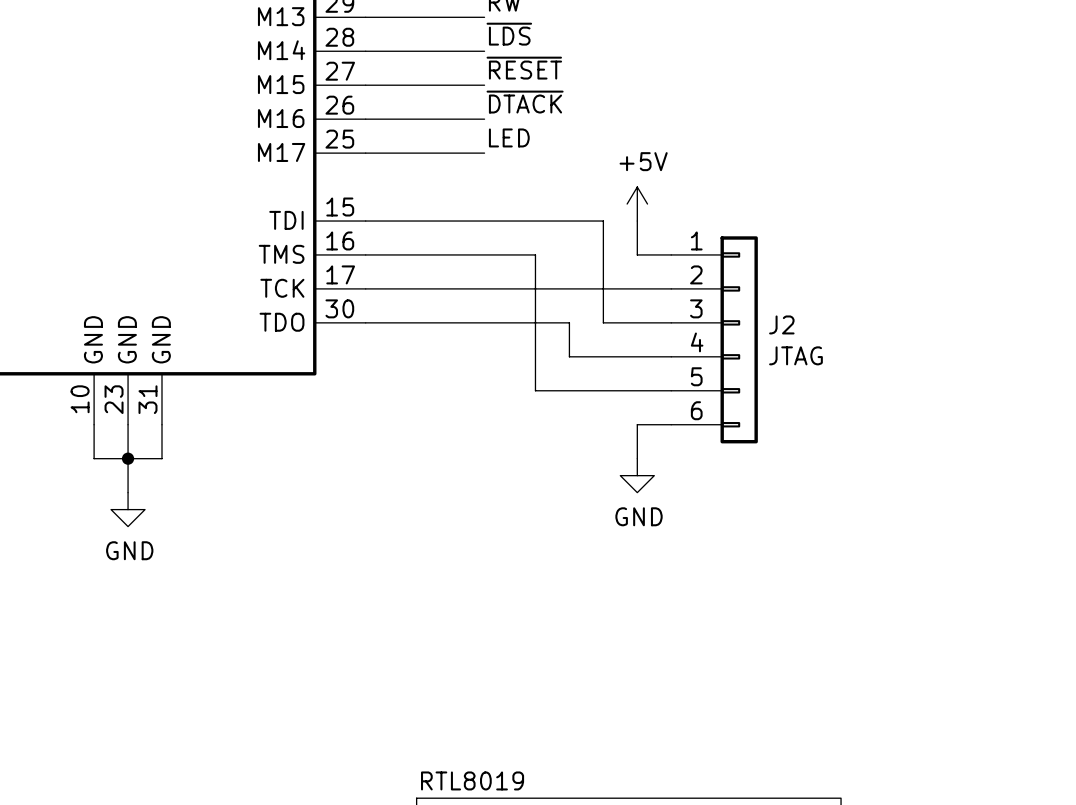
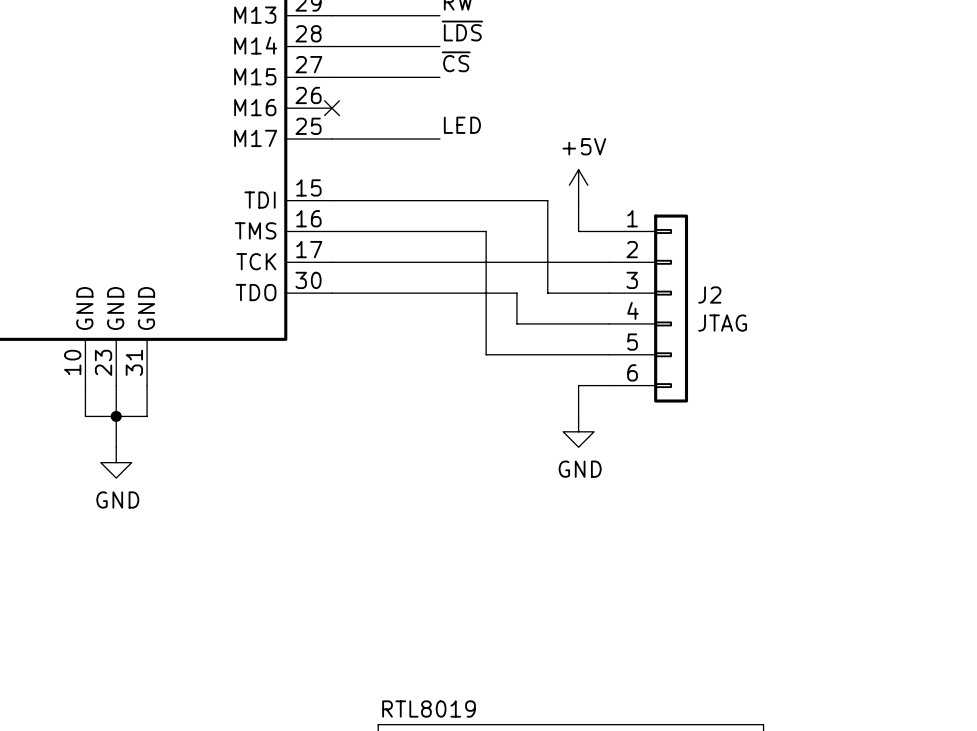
label: ~{RESET} (524, 68) -> ~{CS} (456, 61)
label: ~{DTACK} (525, 102) -> none
wire: (365, 119) (484, 119) -> none
no-connect mark: none -> (332, 108)

